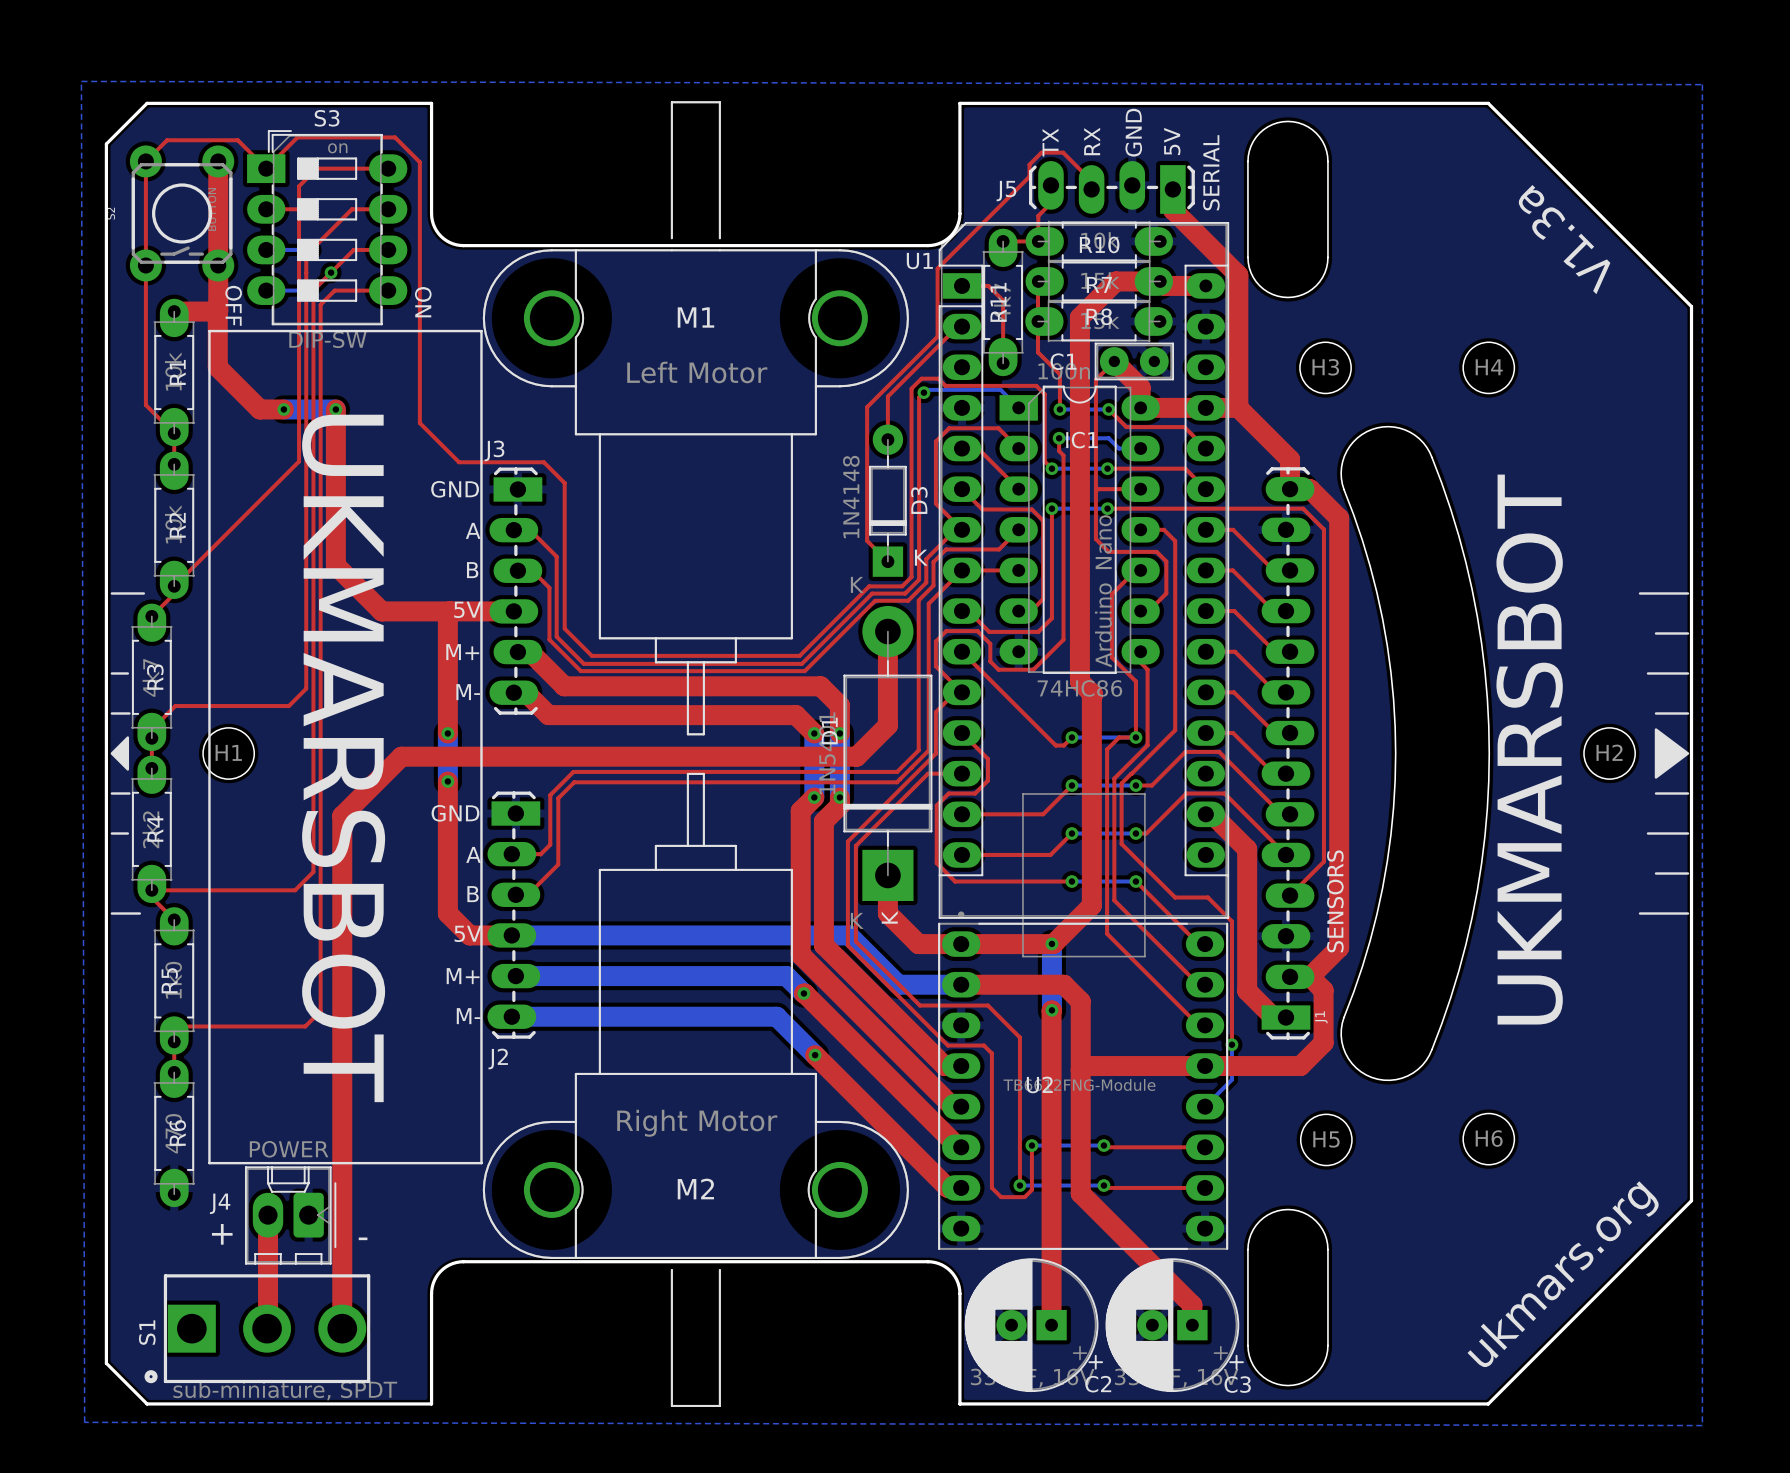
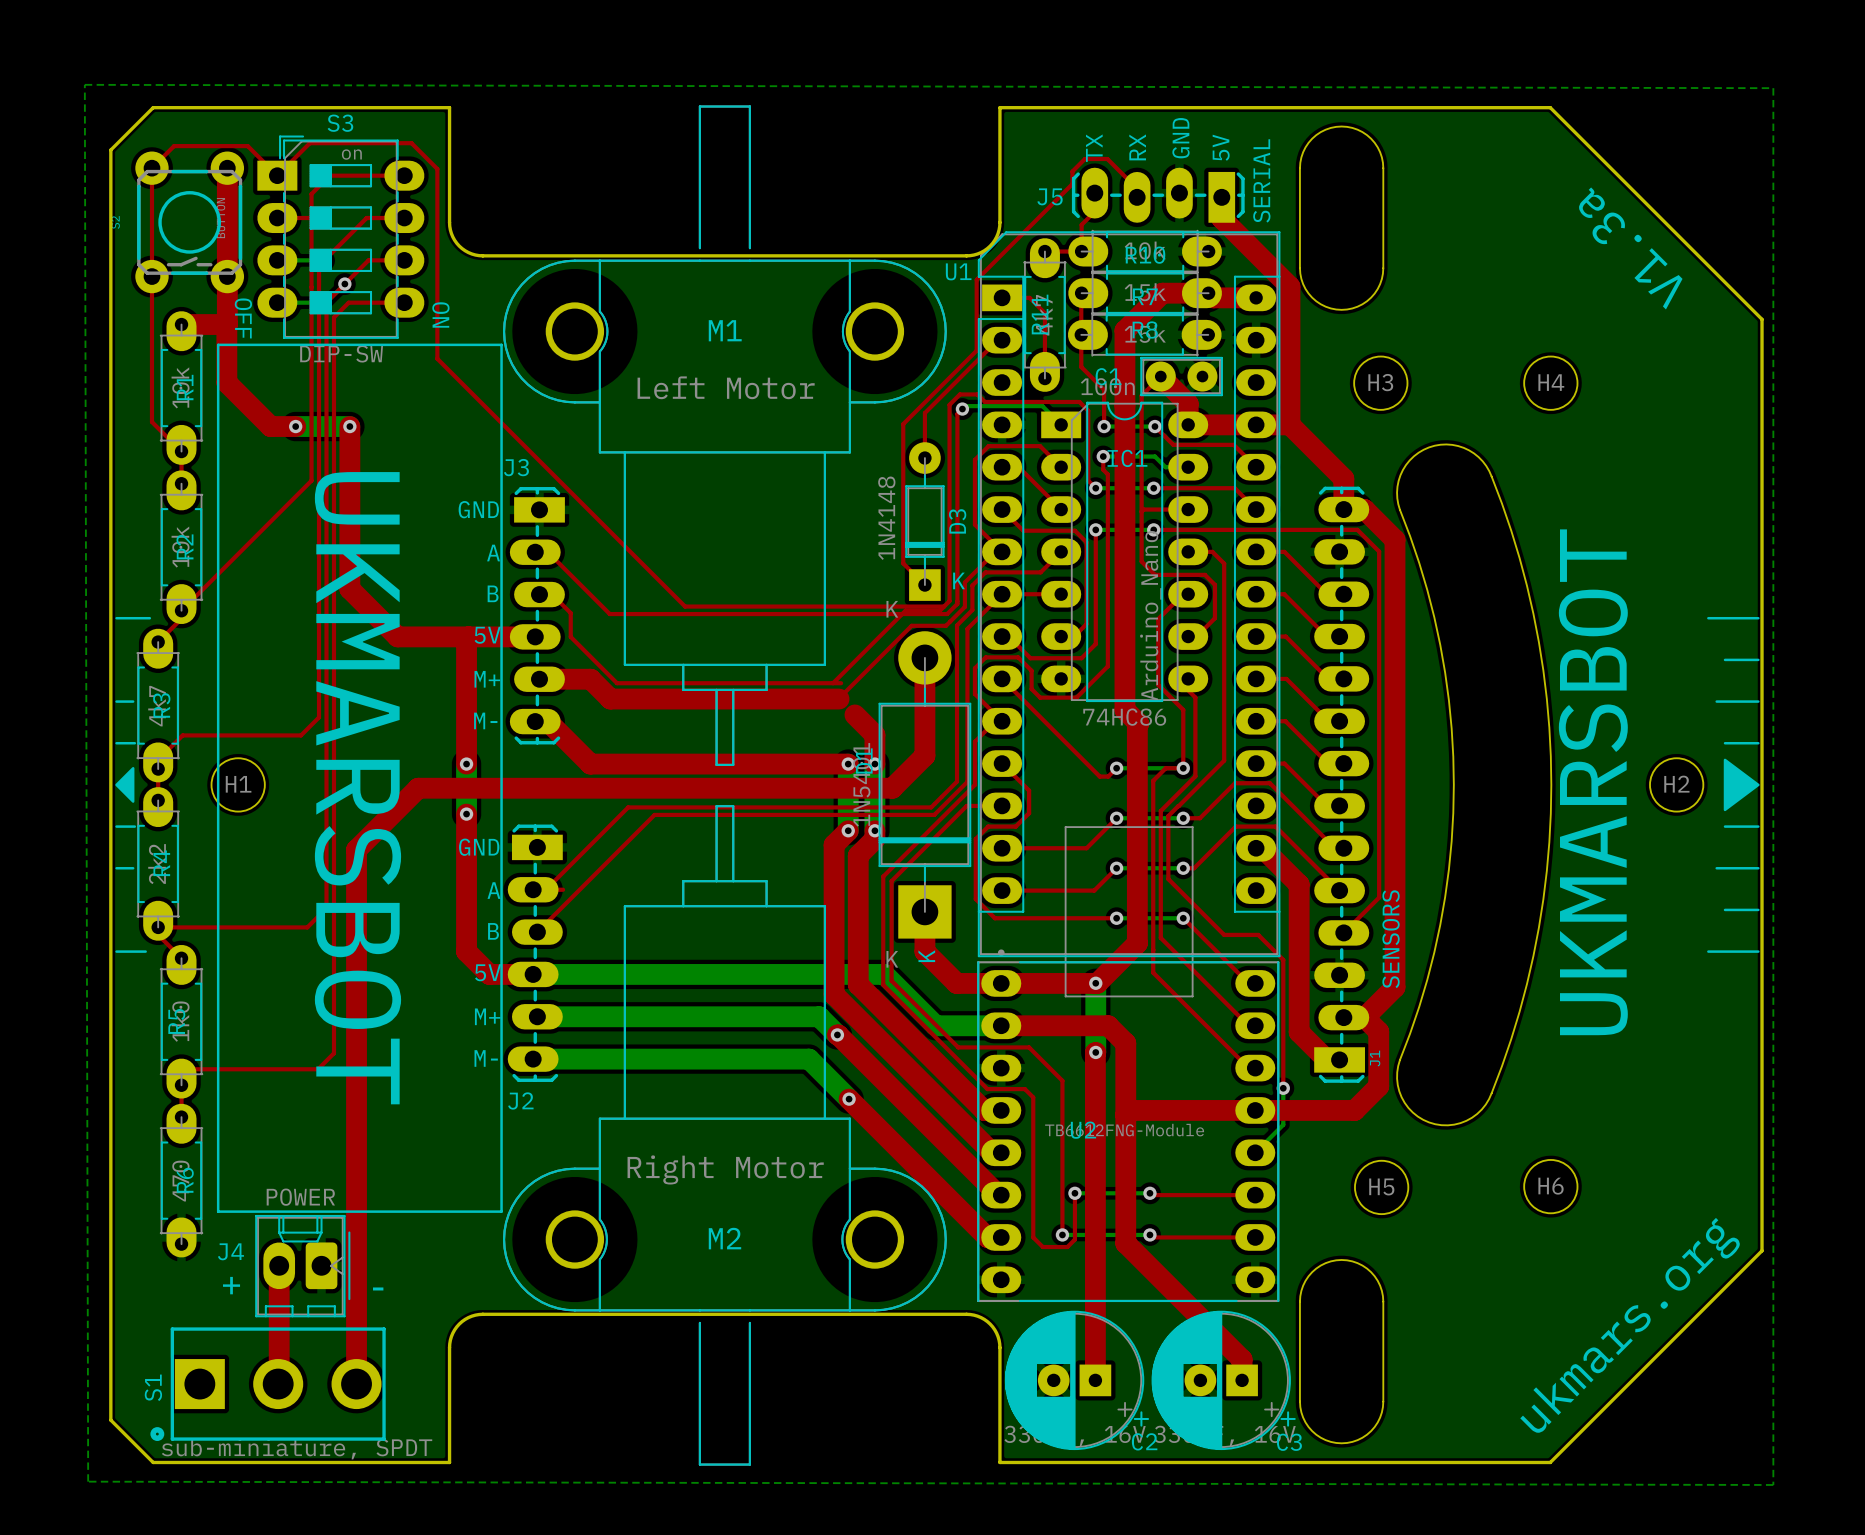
top track: (419, 344) (419, 423) (459, 462) (543, 462) (564, 483) (564, 628) (592, 655) -> (552, 594) (570, 613) (570, 636) (617, 683)
top track: none -> (437, 358) (685, 606) (944, 606)
top track: (513, 530) (530, 530) (556, 556) (556, 636) (583, 663) (801, 663) (872, 593) (905, 593) (909, 589) -> (547, 552) (609, 614) (947, 614)
top track: (517, 570) (532, 570) (549, 587) (549, 639) (580, 671) (586, 671) -> (552, 679) (590, 679) (610, 699)
top track: (530, 652) (564, 686) (820, 686) -> none
top track width: thin (580, 671) (804, 671) -> thick (605, 699) (838, 699)
top track: (548, 715) (795, 715) (814, 733) -> (571, 744) (590, 764) (848, 764)
top track: (897, 771) (573, 771) (550, 795) (550, 844) (540, 854) -> (934, 804) (931, 807) (628, 807) (545, 889)
top track: (628, 782) (574, 782) (558, 798) (558, 864) (528, 894) (515, 894) -> (654, 814) (537, 932)

